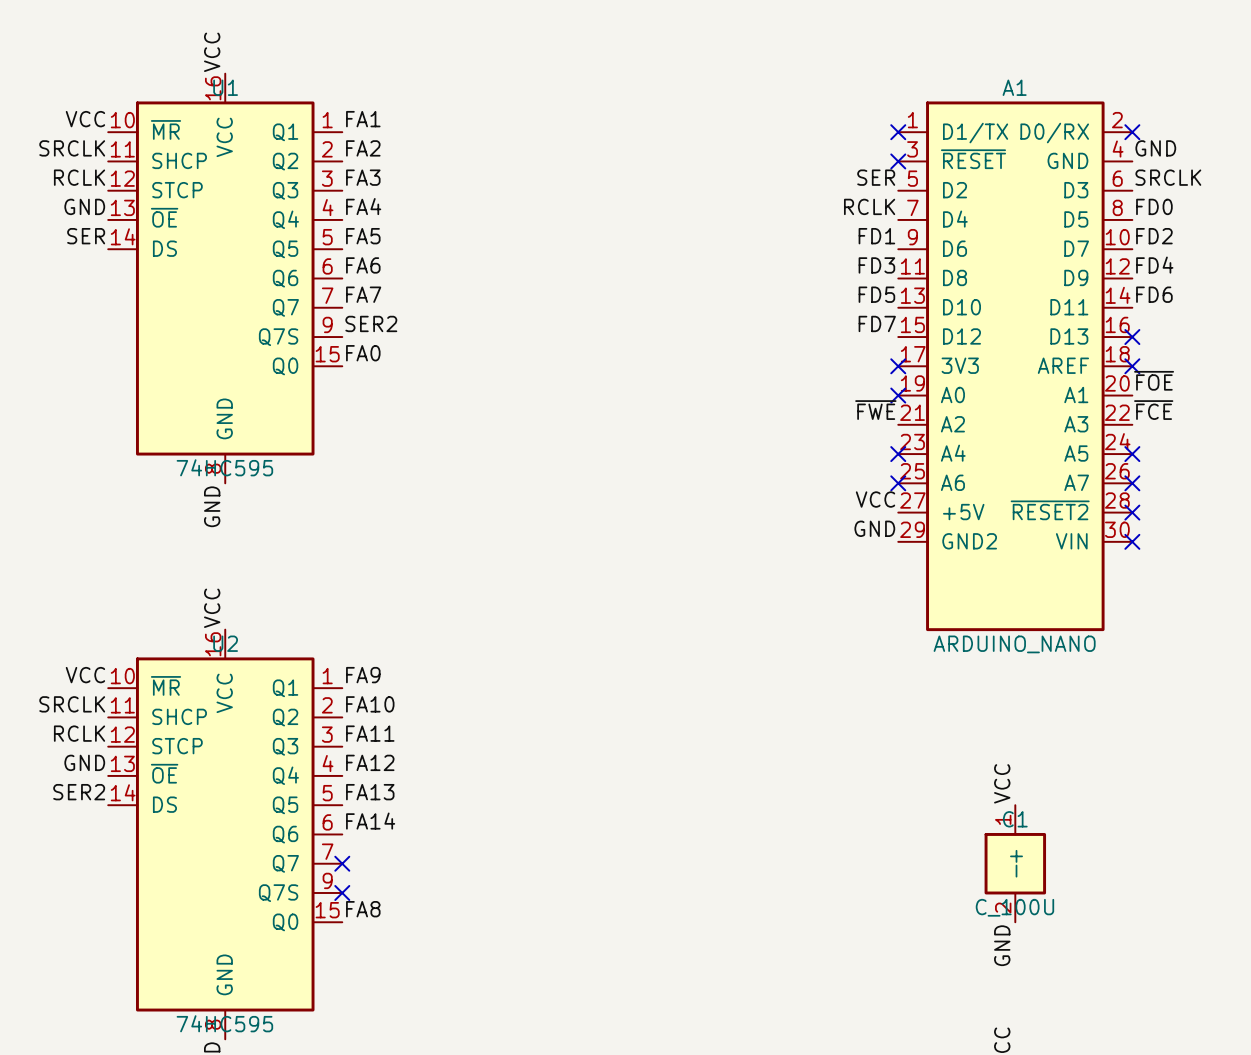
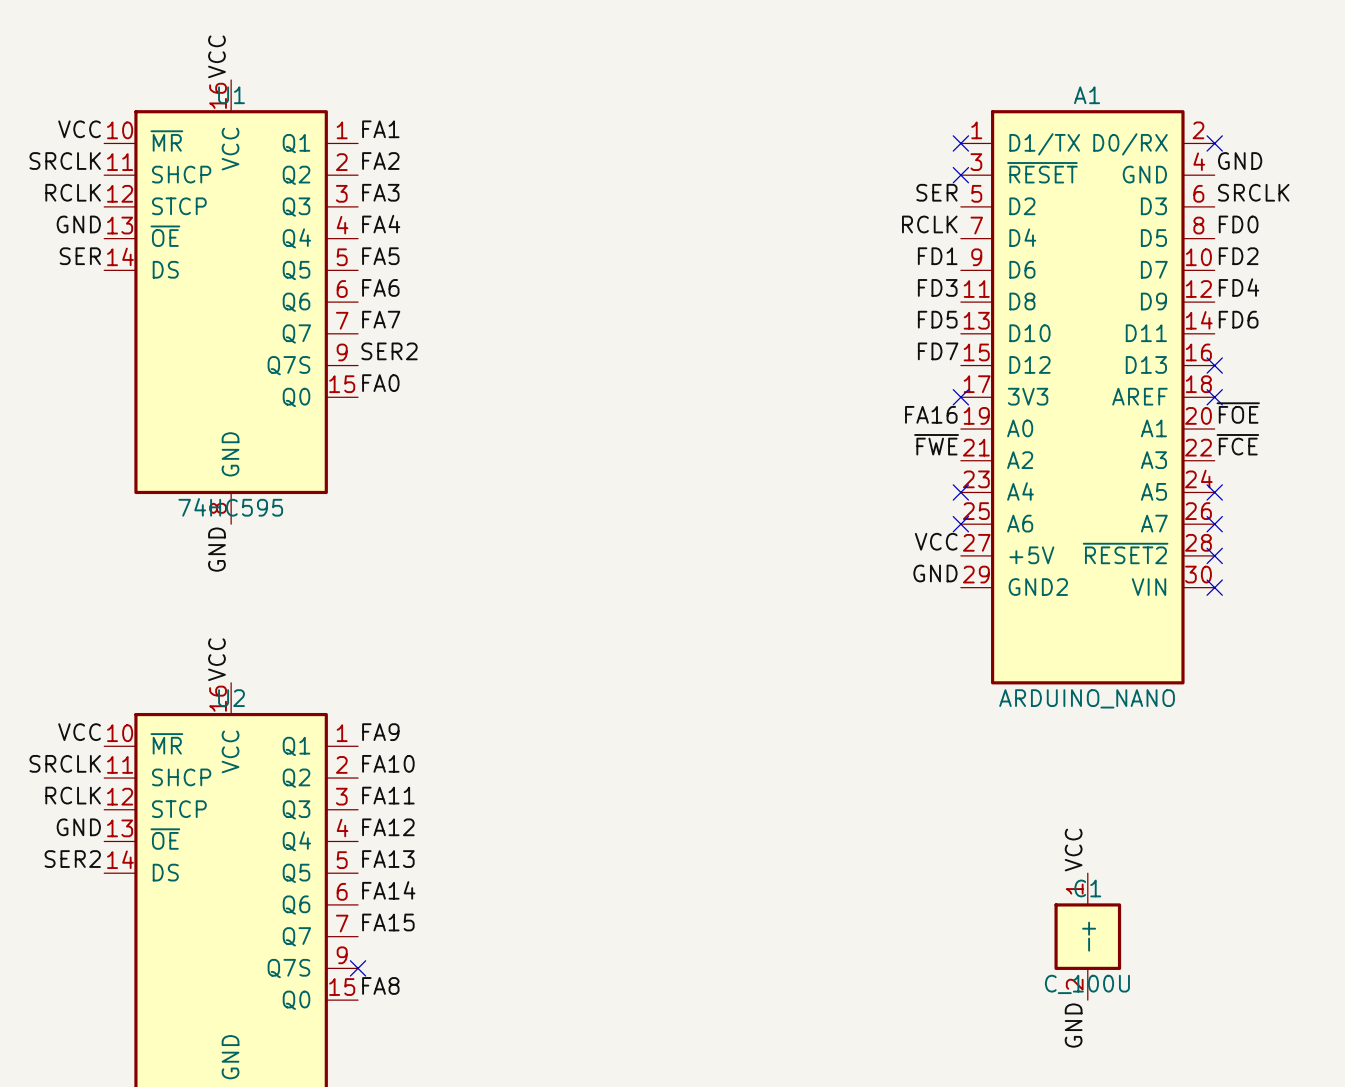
label: none -> FA16 (931, 414)
no-connect mark: (898, 395) -> none
label: none -> FA15 (388, 922)
no-connect mark: (342, 863) -> none

